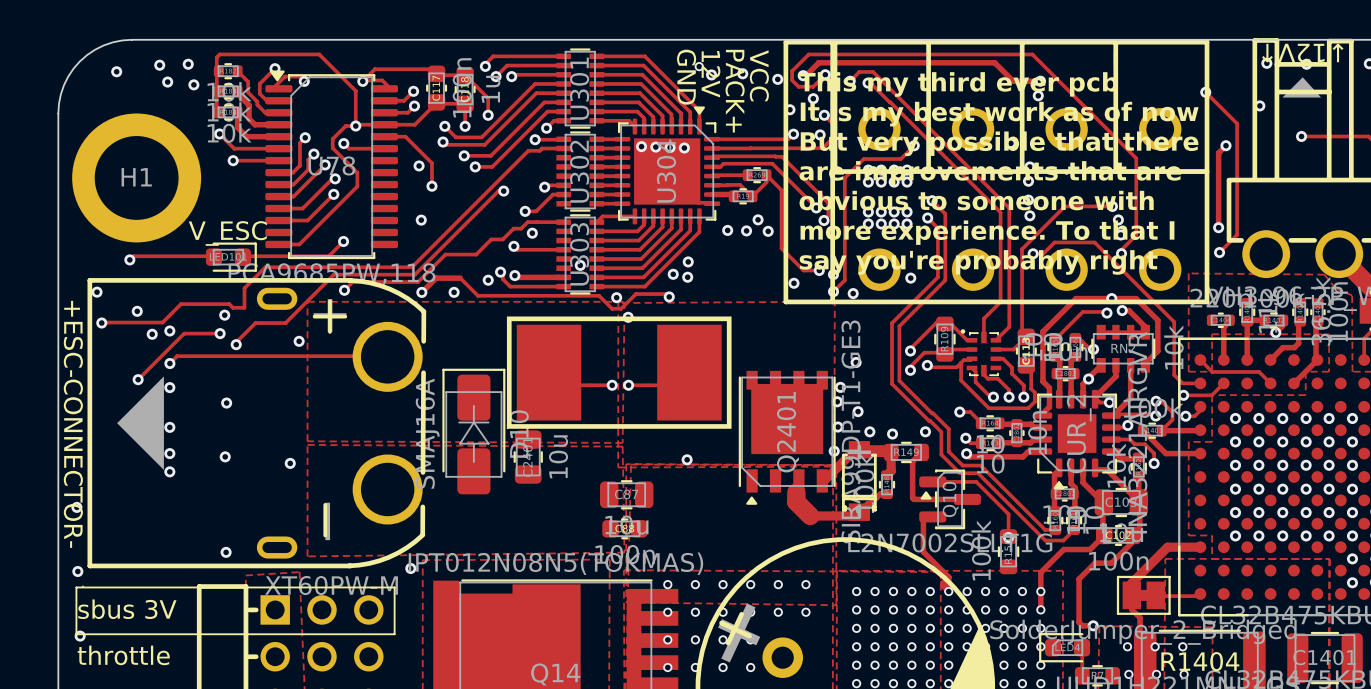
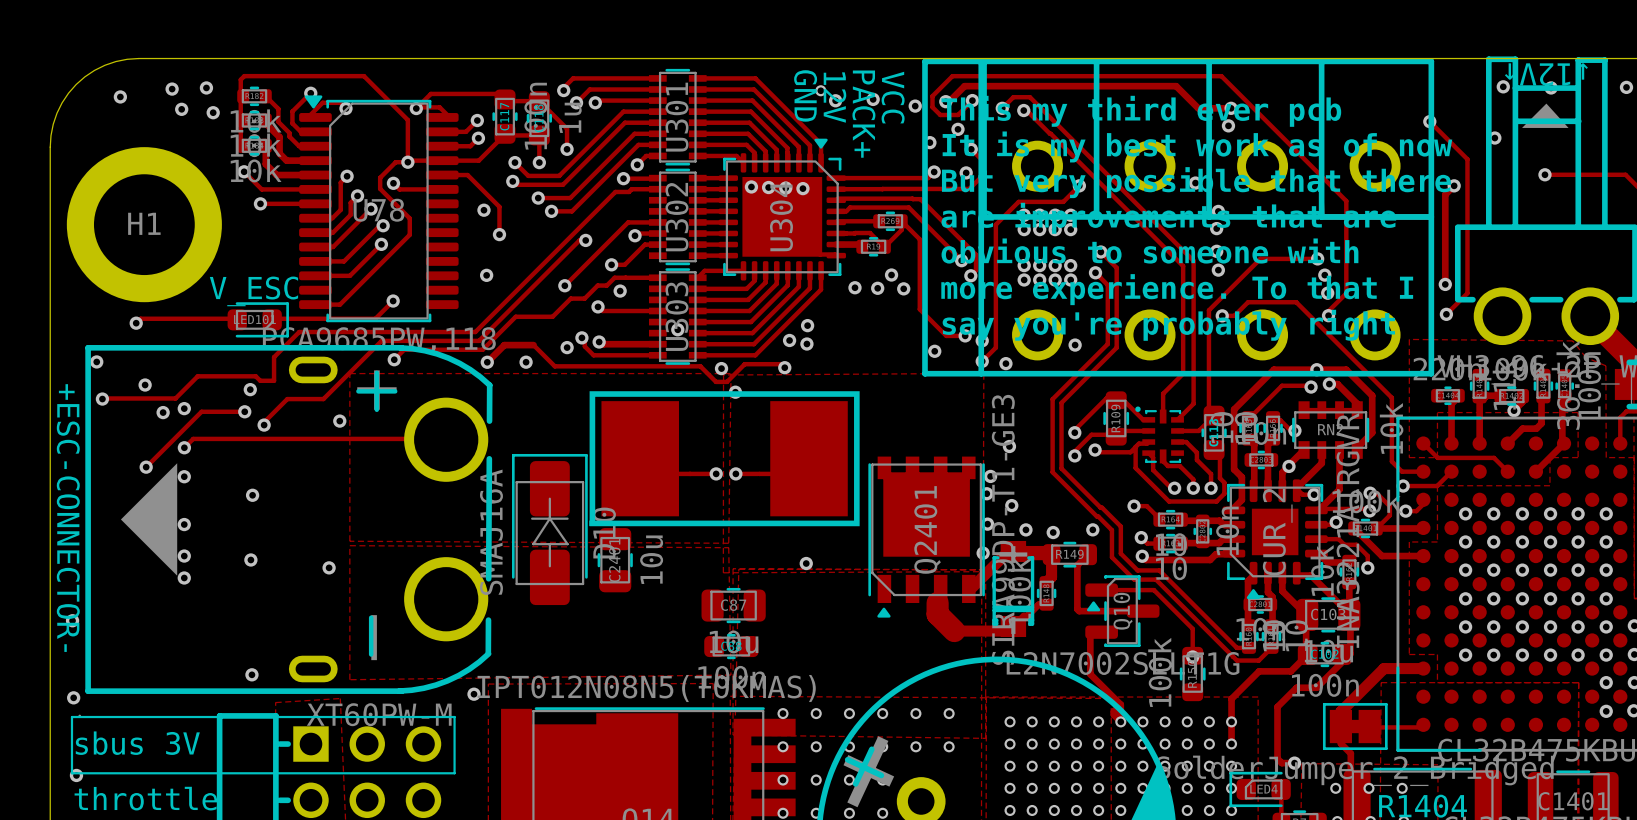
track: none -> (657, 222) (628, 222) (564, 285)
via: none -> (564, 285)

